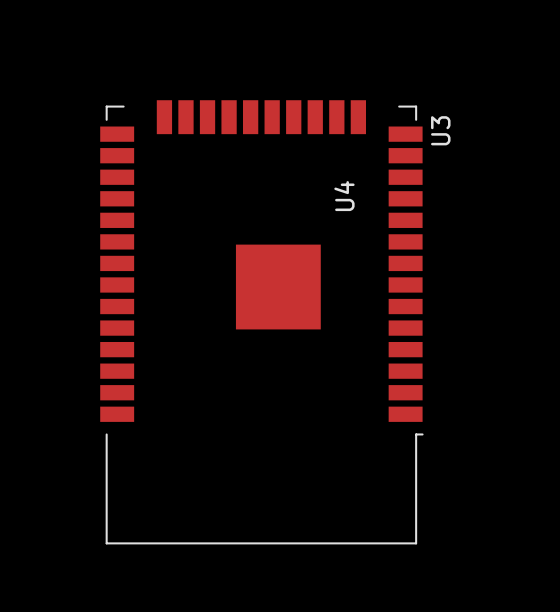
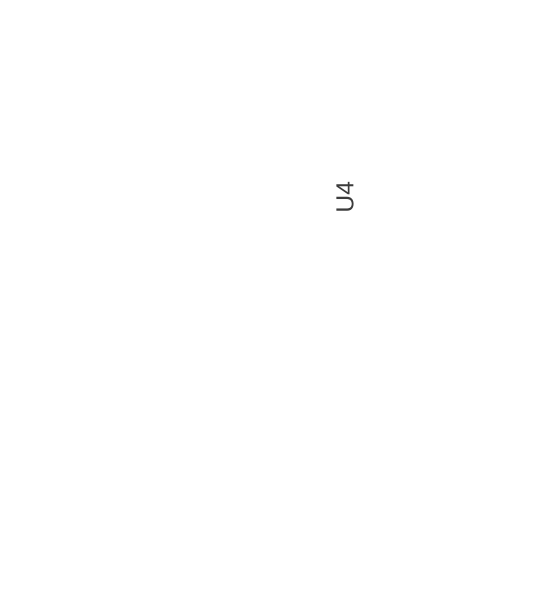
U3: (261, 322) -> none

